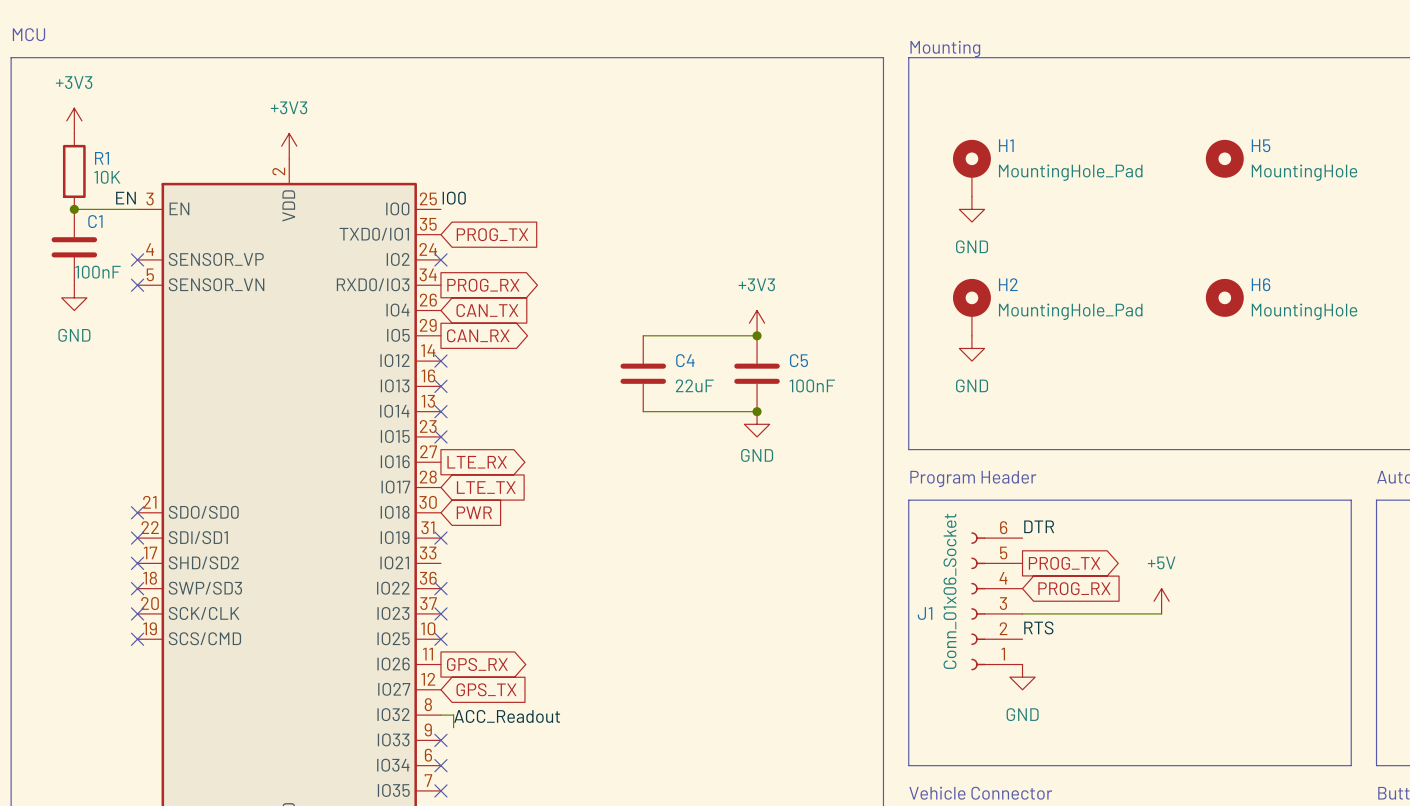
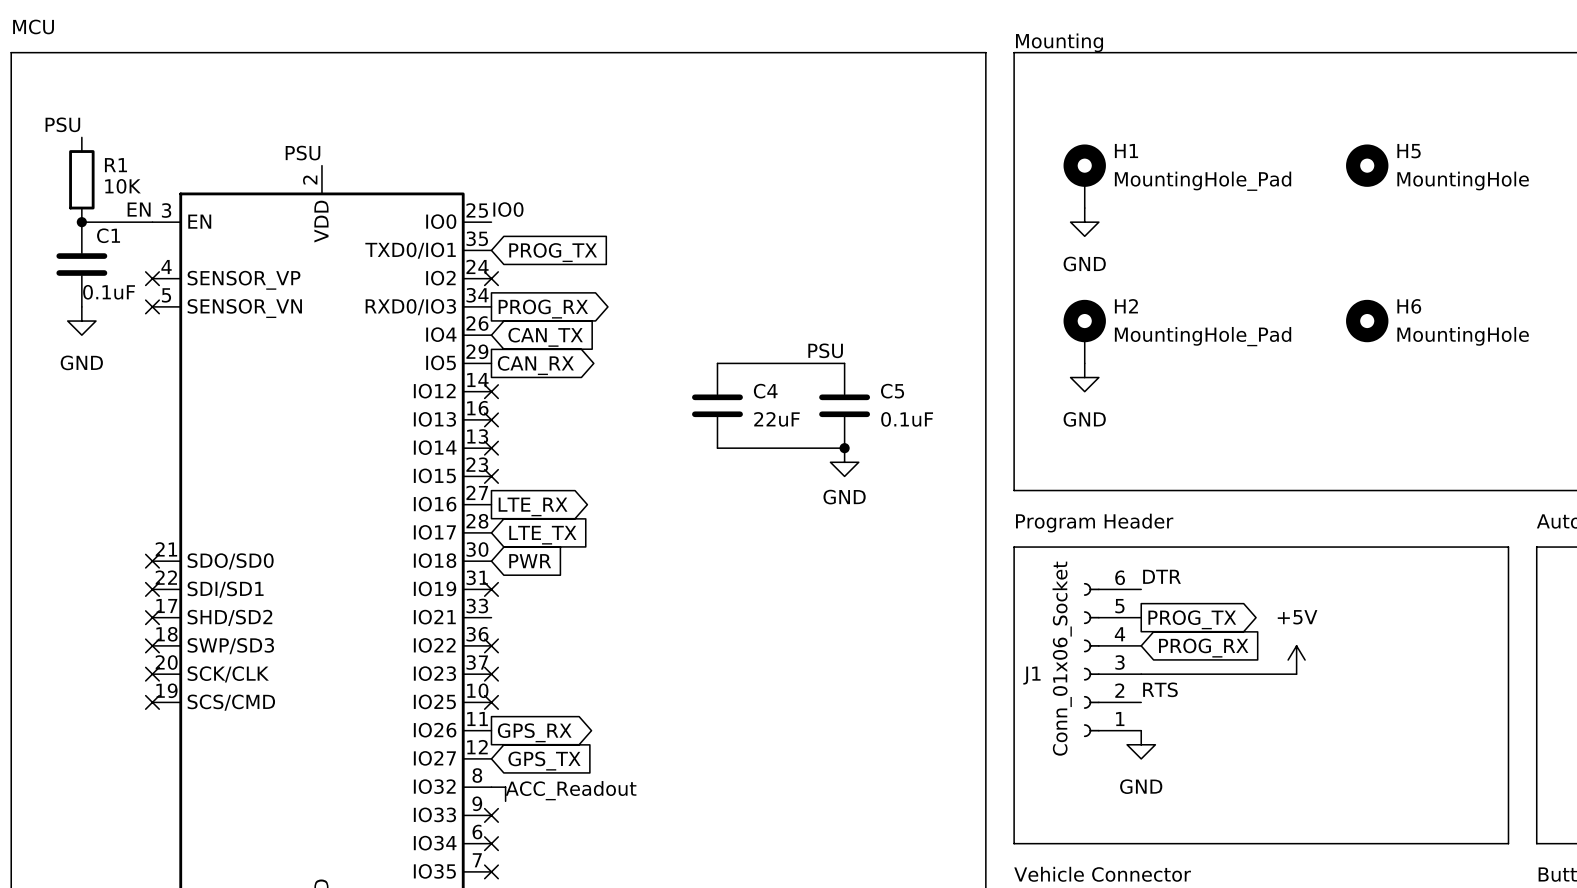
power symbol: +3V3 (74, 120) -> none
label: none -> PSU (62, 124)
power symbol: +3V3 (289, 146) -> none
label: none -> PSU (303, 153)
C1 value: 100nF (98, 272) -> 0.1uF (109, 292)
power symbol: +3V3 (757, 323) -> none
label: none -> PSU (825, 350)
junction: (757, 335) -> none
C5 value: 100nF (812, 385) -> 0.1uF (907, 419)

